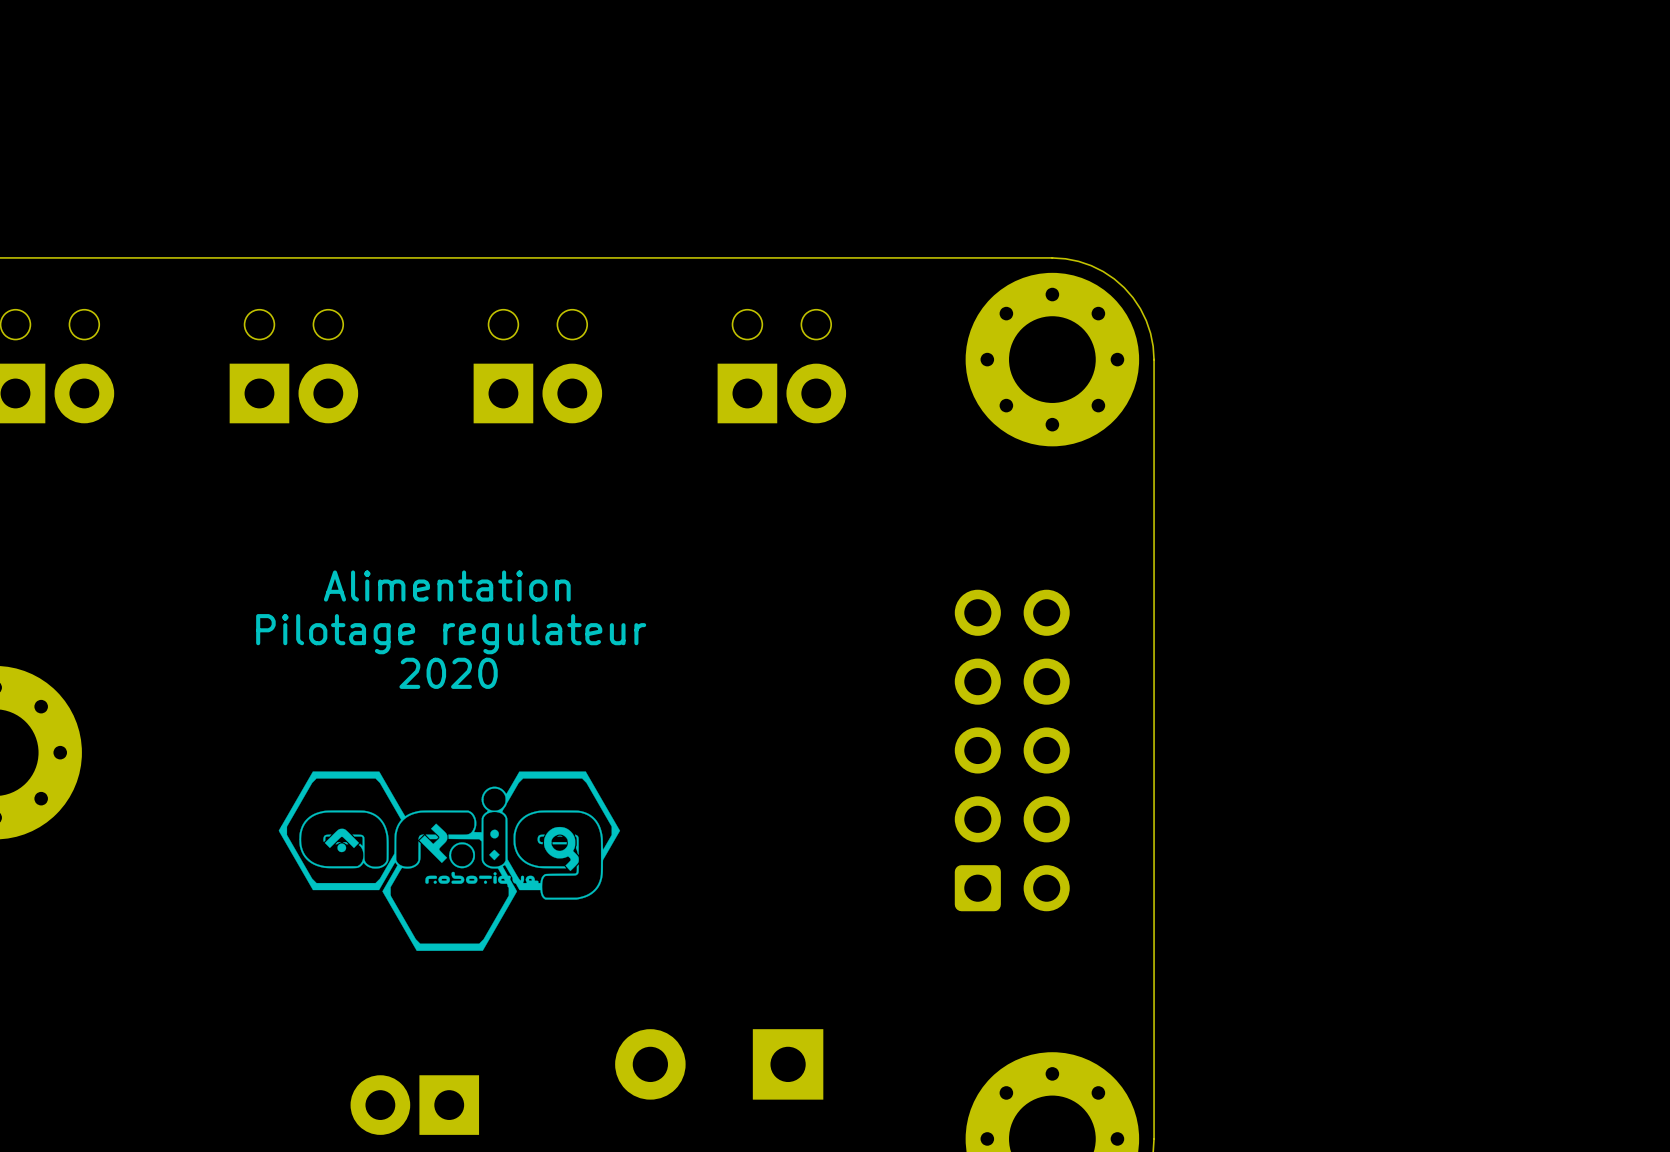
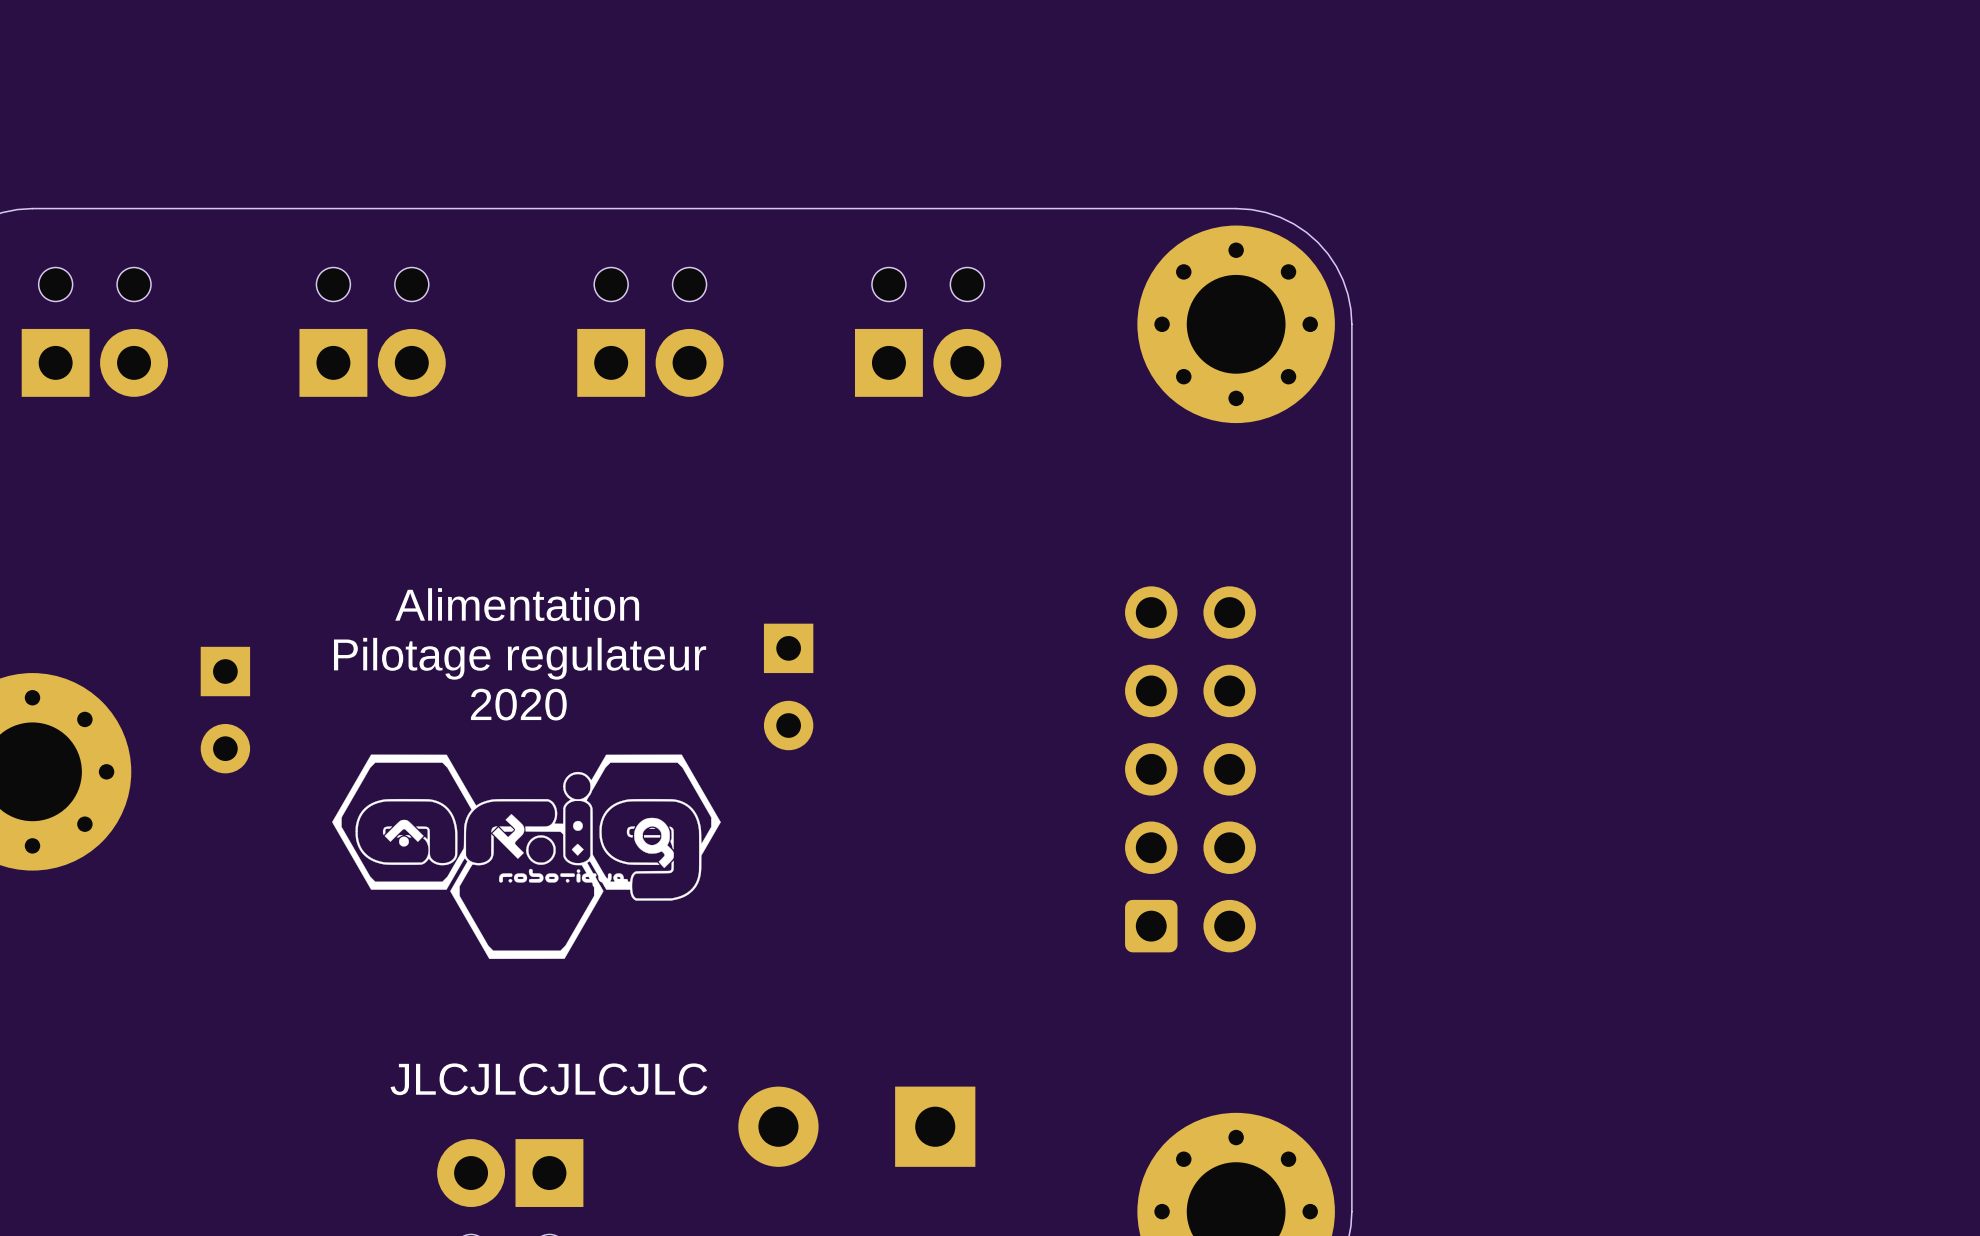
text position: Alimentation (447, 586) -> Alimentation (517, 604)
text position: Pilotage regulateur (451, 634) -> Pilotage regulateur (520, 658)
text position: 2020 (448, 673) -> 2020 (518, 704)
part: none -> (788, 686)
part: none -> (225, 710)
drawing position: (449, 861) -> (526, 856)
text: none -> JLCJLCJLCJLC (548, 1079)

